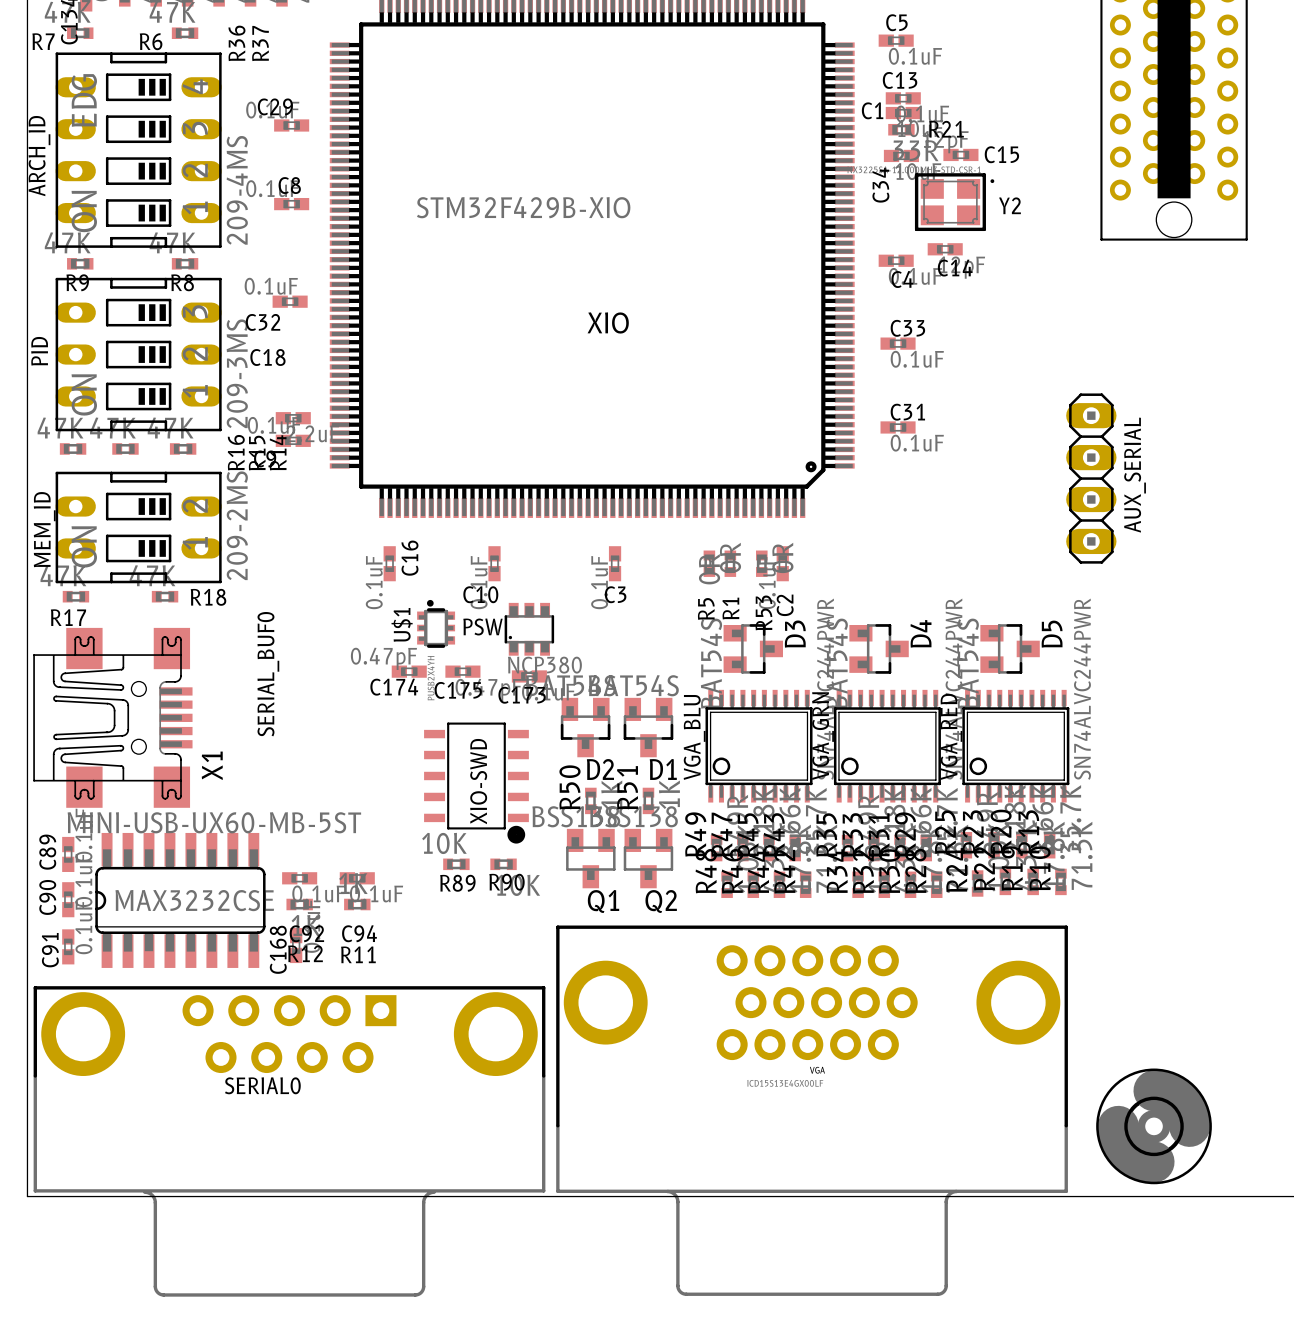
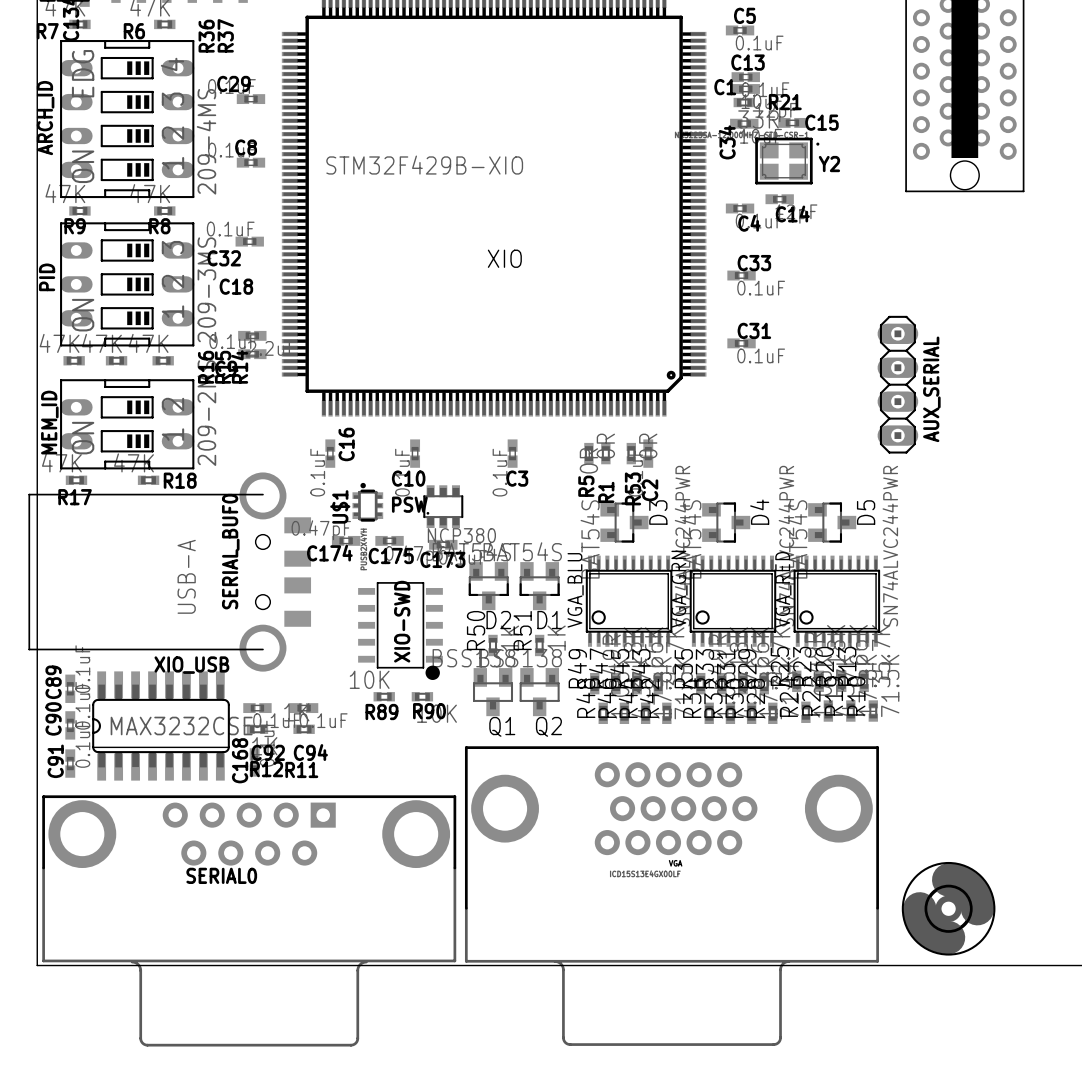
XIO_USB: none -> USB-A (169, 572)
X1: MINI-USB-UX60-MB-5ST (112, 717) -> none

